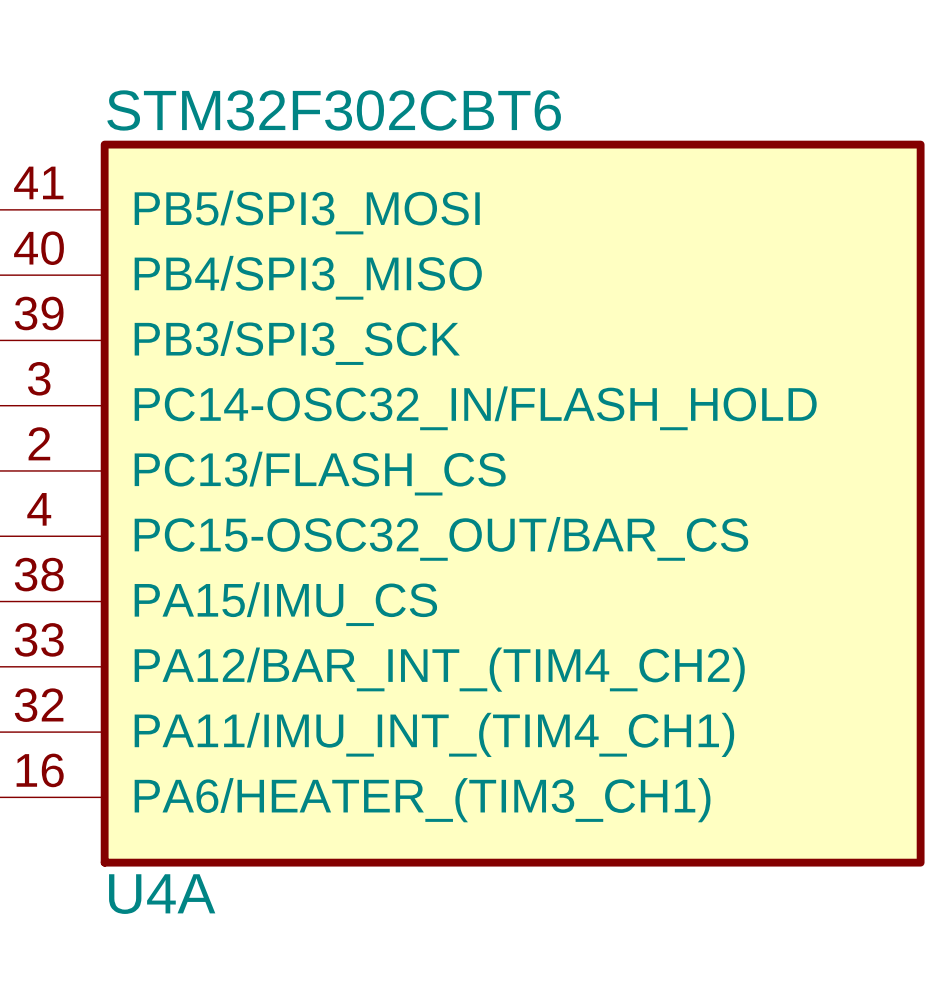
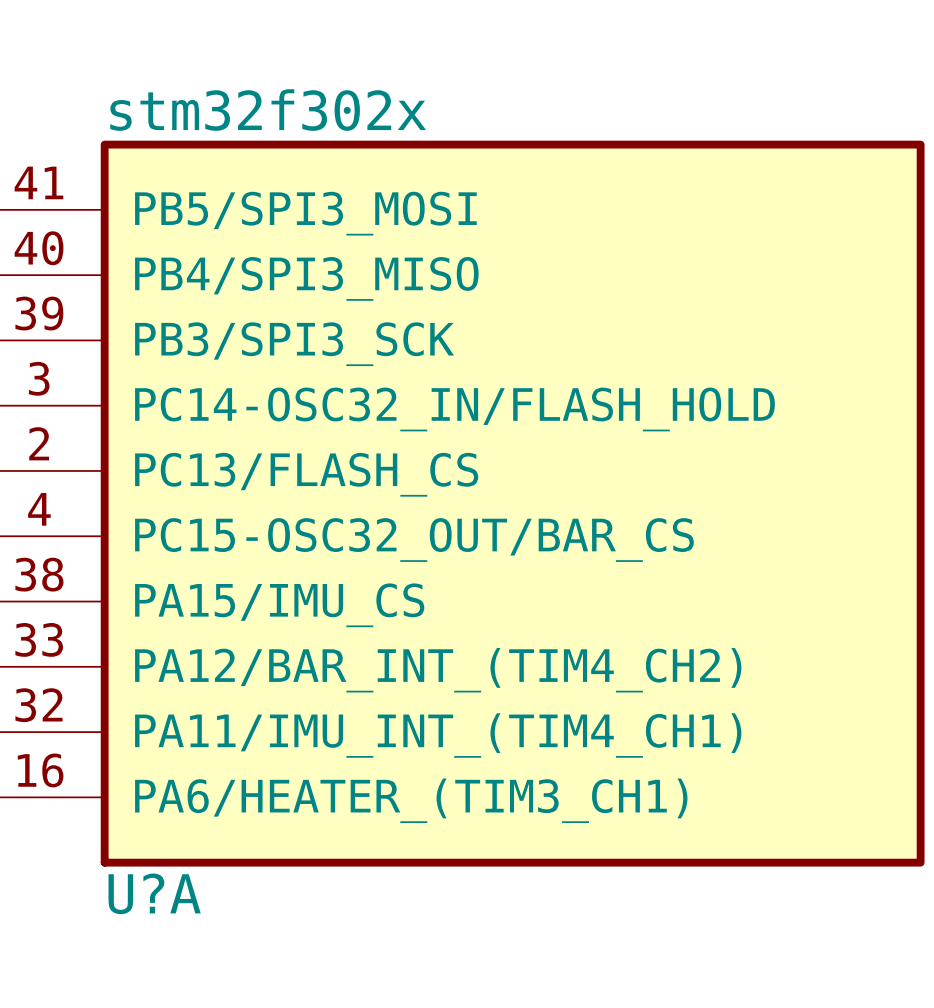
U4A value: STM32F302CBT6 (334, 110) -> stm32f302x (268, 110)
U4A name: U4A (162, 894) -> U?A (154, 893)

